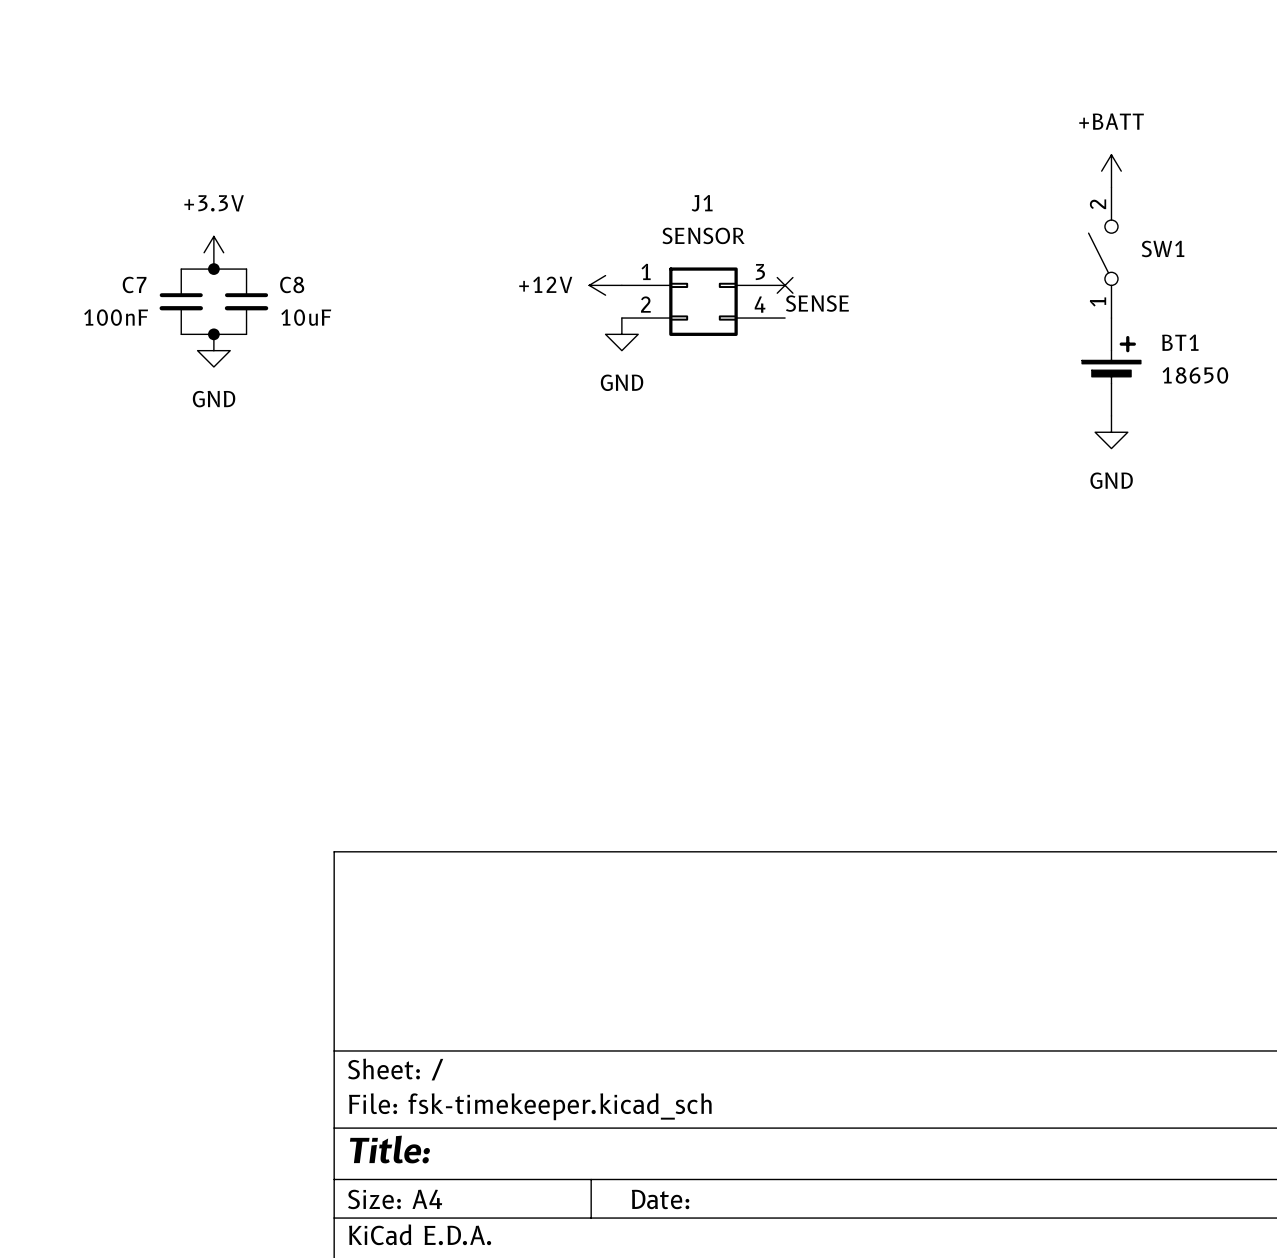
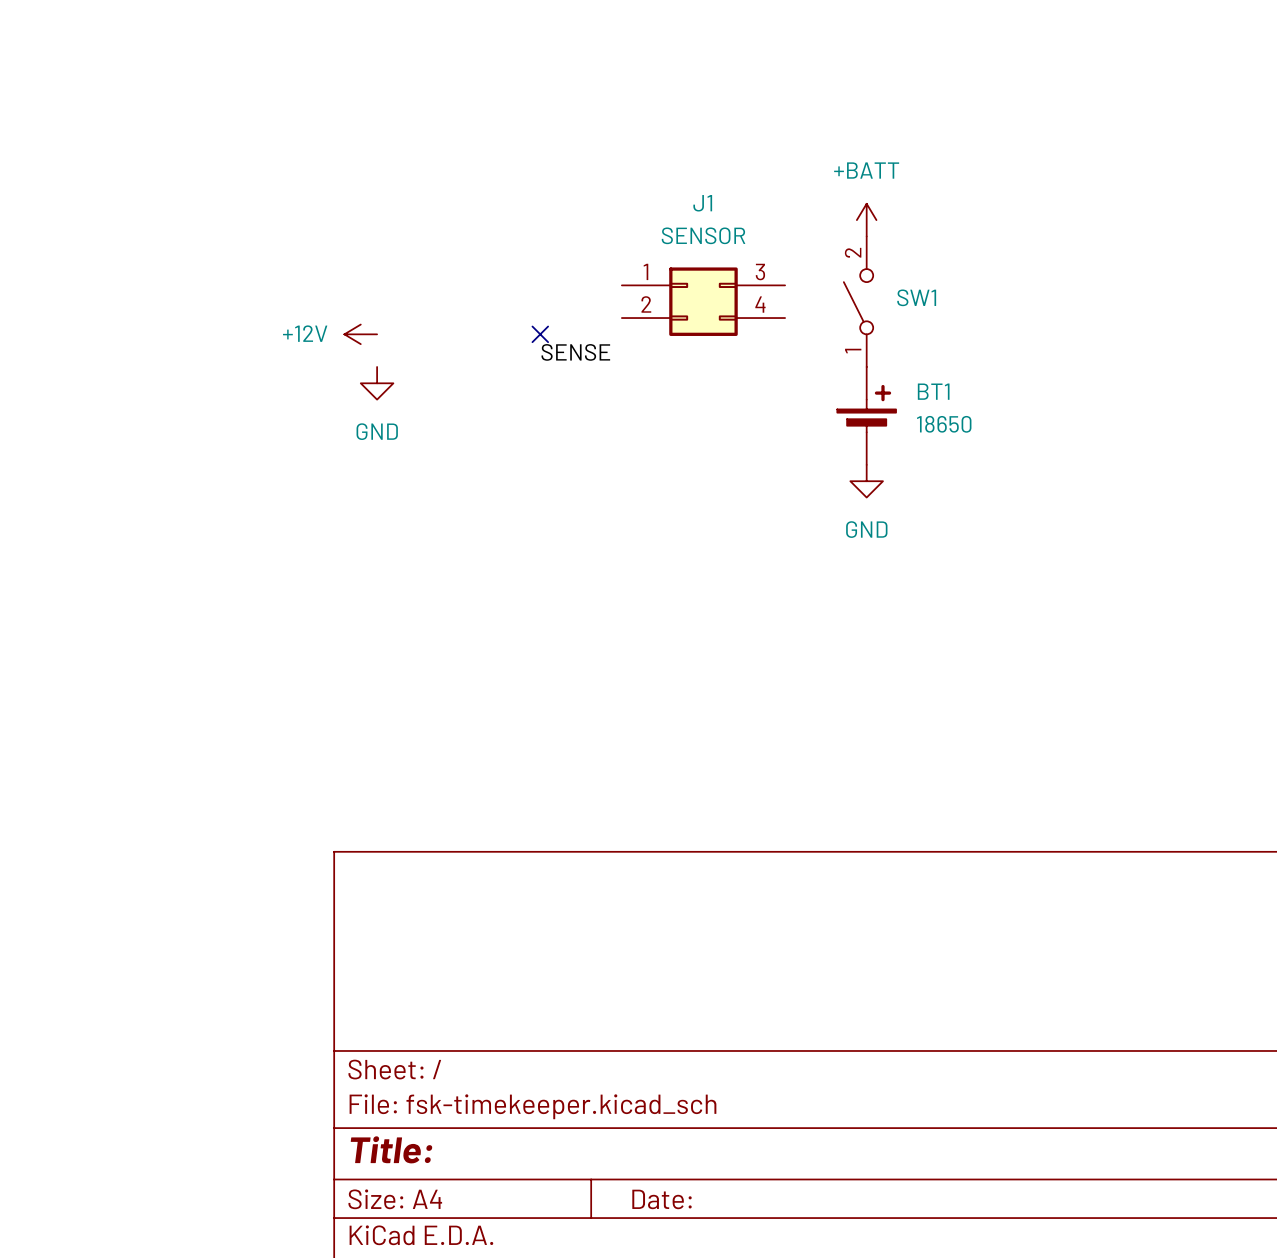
power symbol position: +BATT (1111, 171) -> +BATT (866, 220)
power symbol: +3.3V (213, 252) -> none
SW1 position: (1103, 252) -> (858, 301)
wire: (181, 269) (246, 269) -> none
junction: (213, 269) -> none
power symbol position: +12V (605, 285) -> +12V (360, 334)
no-connect mark: (785, 285) -> none
C7: 100nF (181, 301) -> none
C8: 10uF (246, 301) -> none
label position: SENSE (817, 303) -> SENSE (575, 352)
wire: (181, 334) (246, 334) -> none
junction: (213, 334) -> none
no-connect mark: none -> (540, 334)
power symbol: GND (621, 334) -> none
power symbol: GND (213, 350) -> none
BT1 position: (1111, 366) -> (866, 415)
power symbol: none -> GND (377, 383)
power symbol: GND (1111, 432) -> none
power symbol: none -> GND (866, 481)

